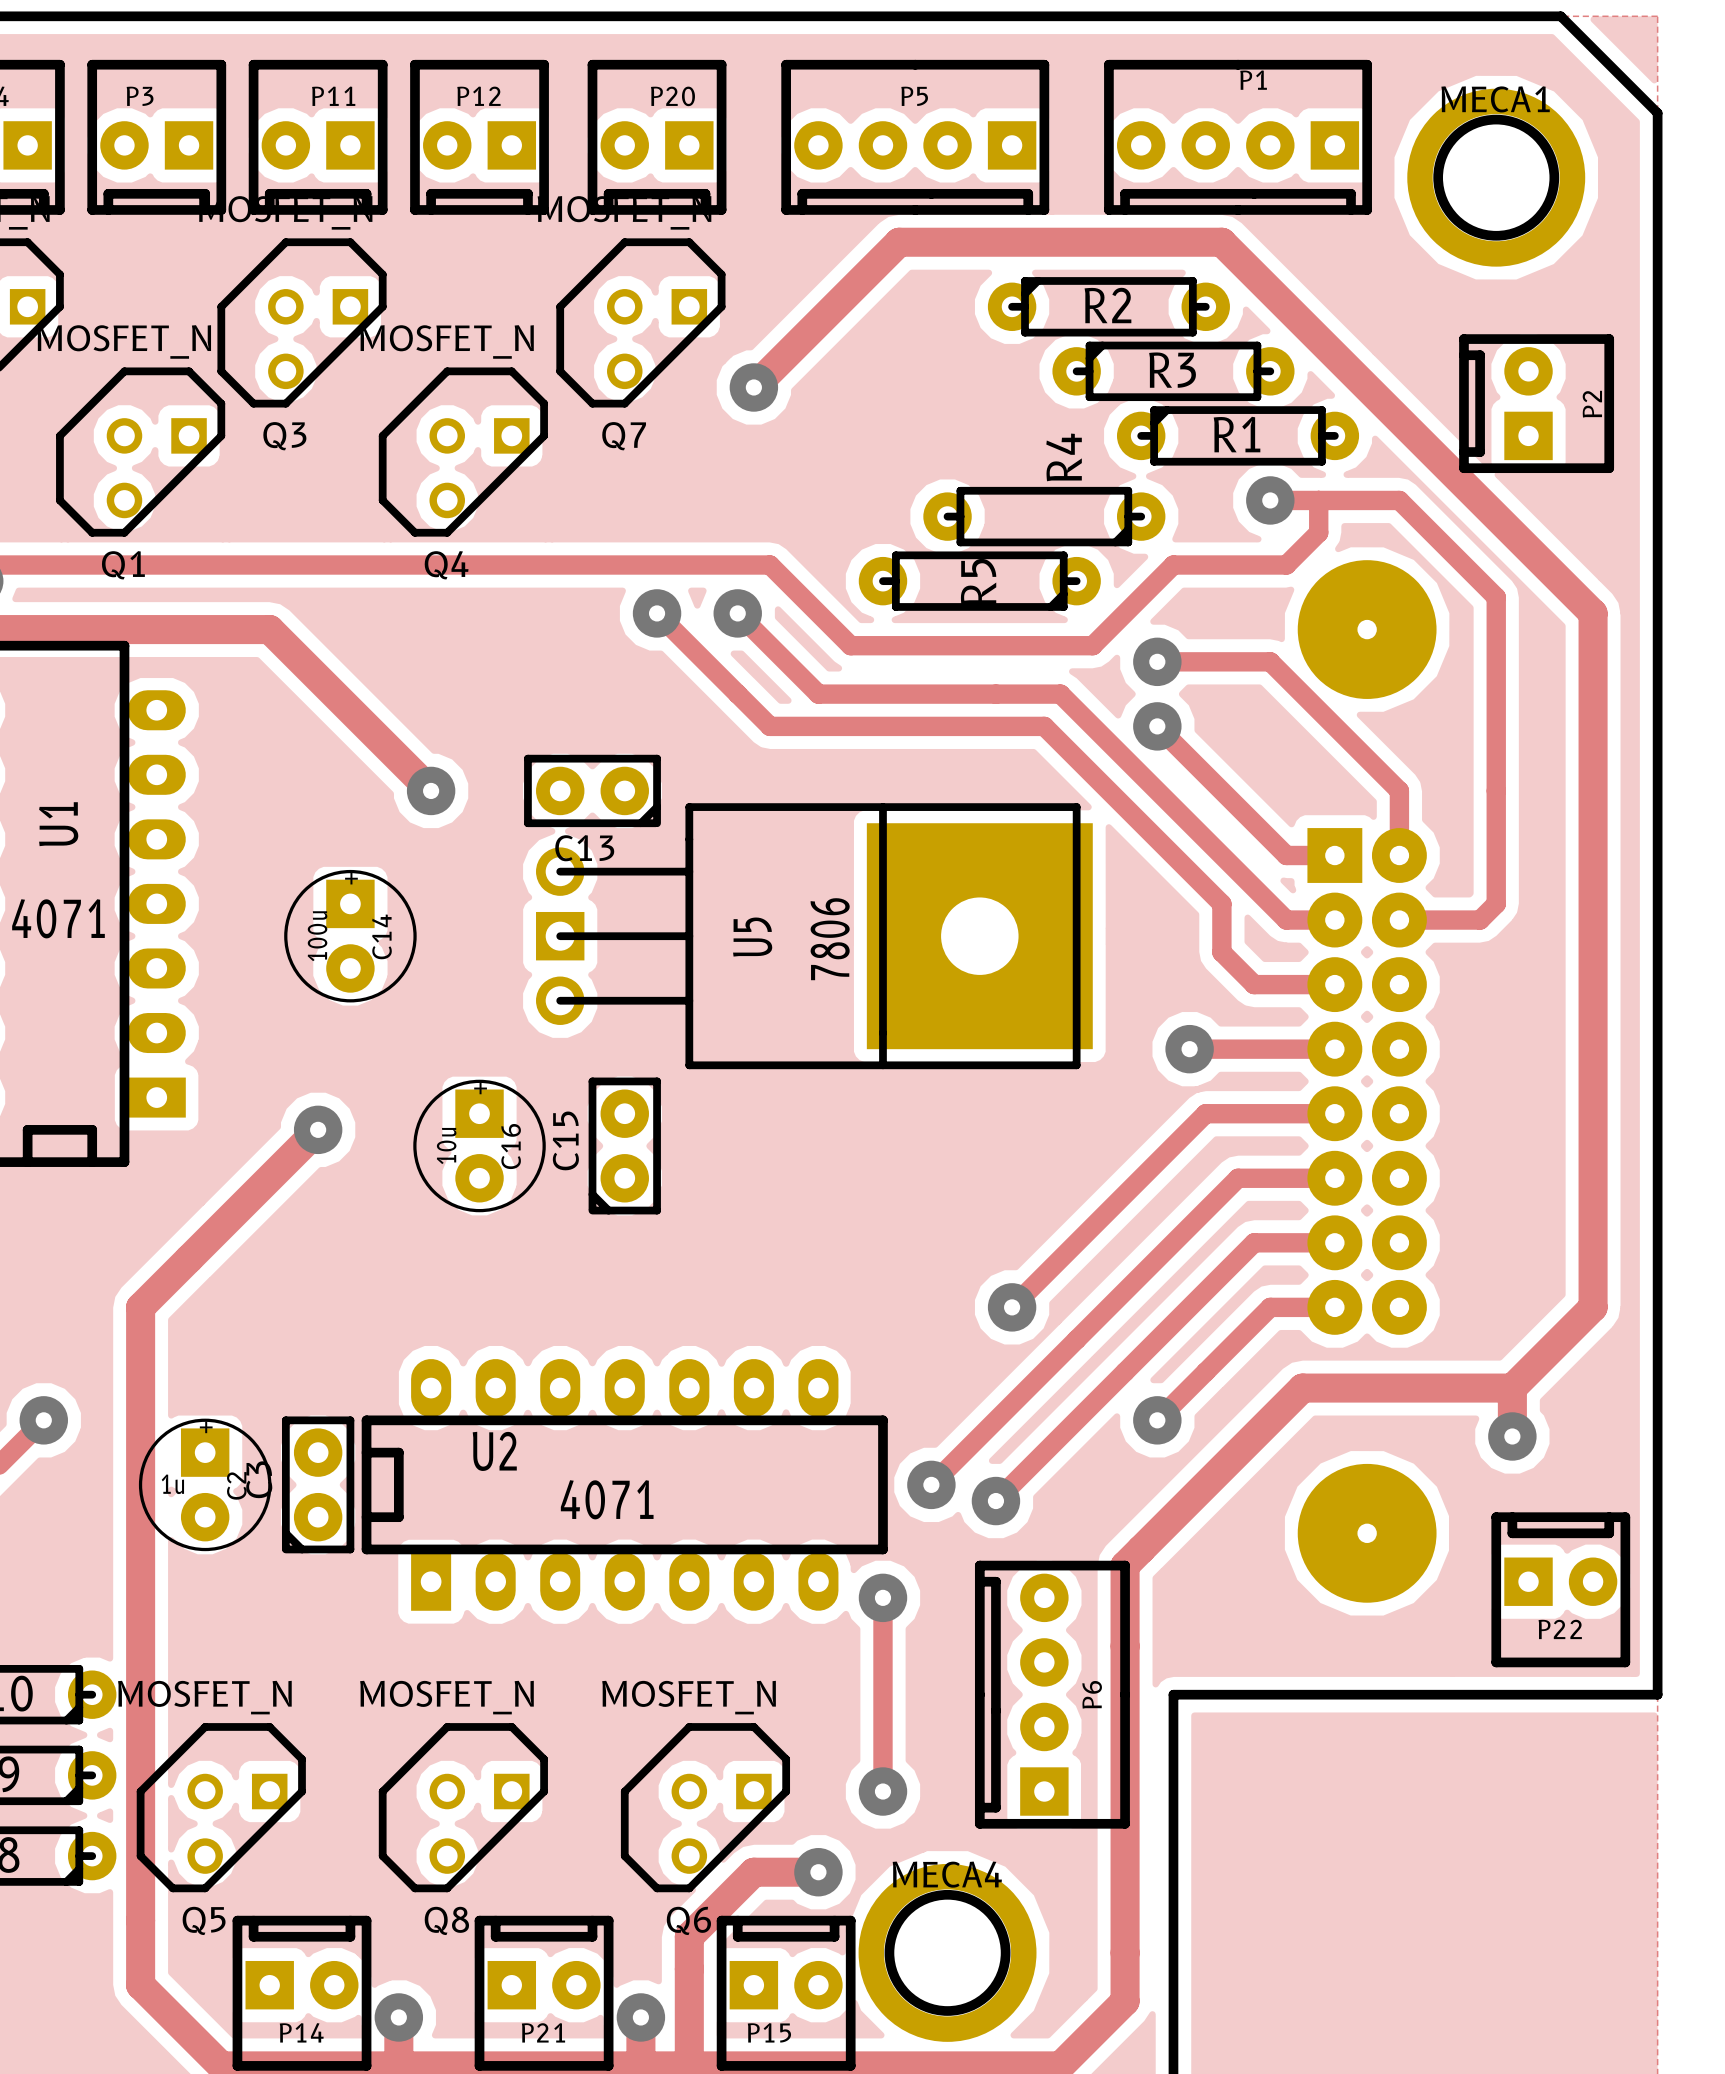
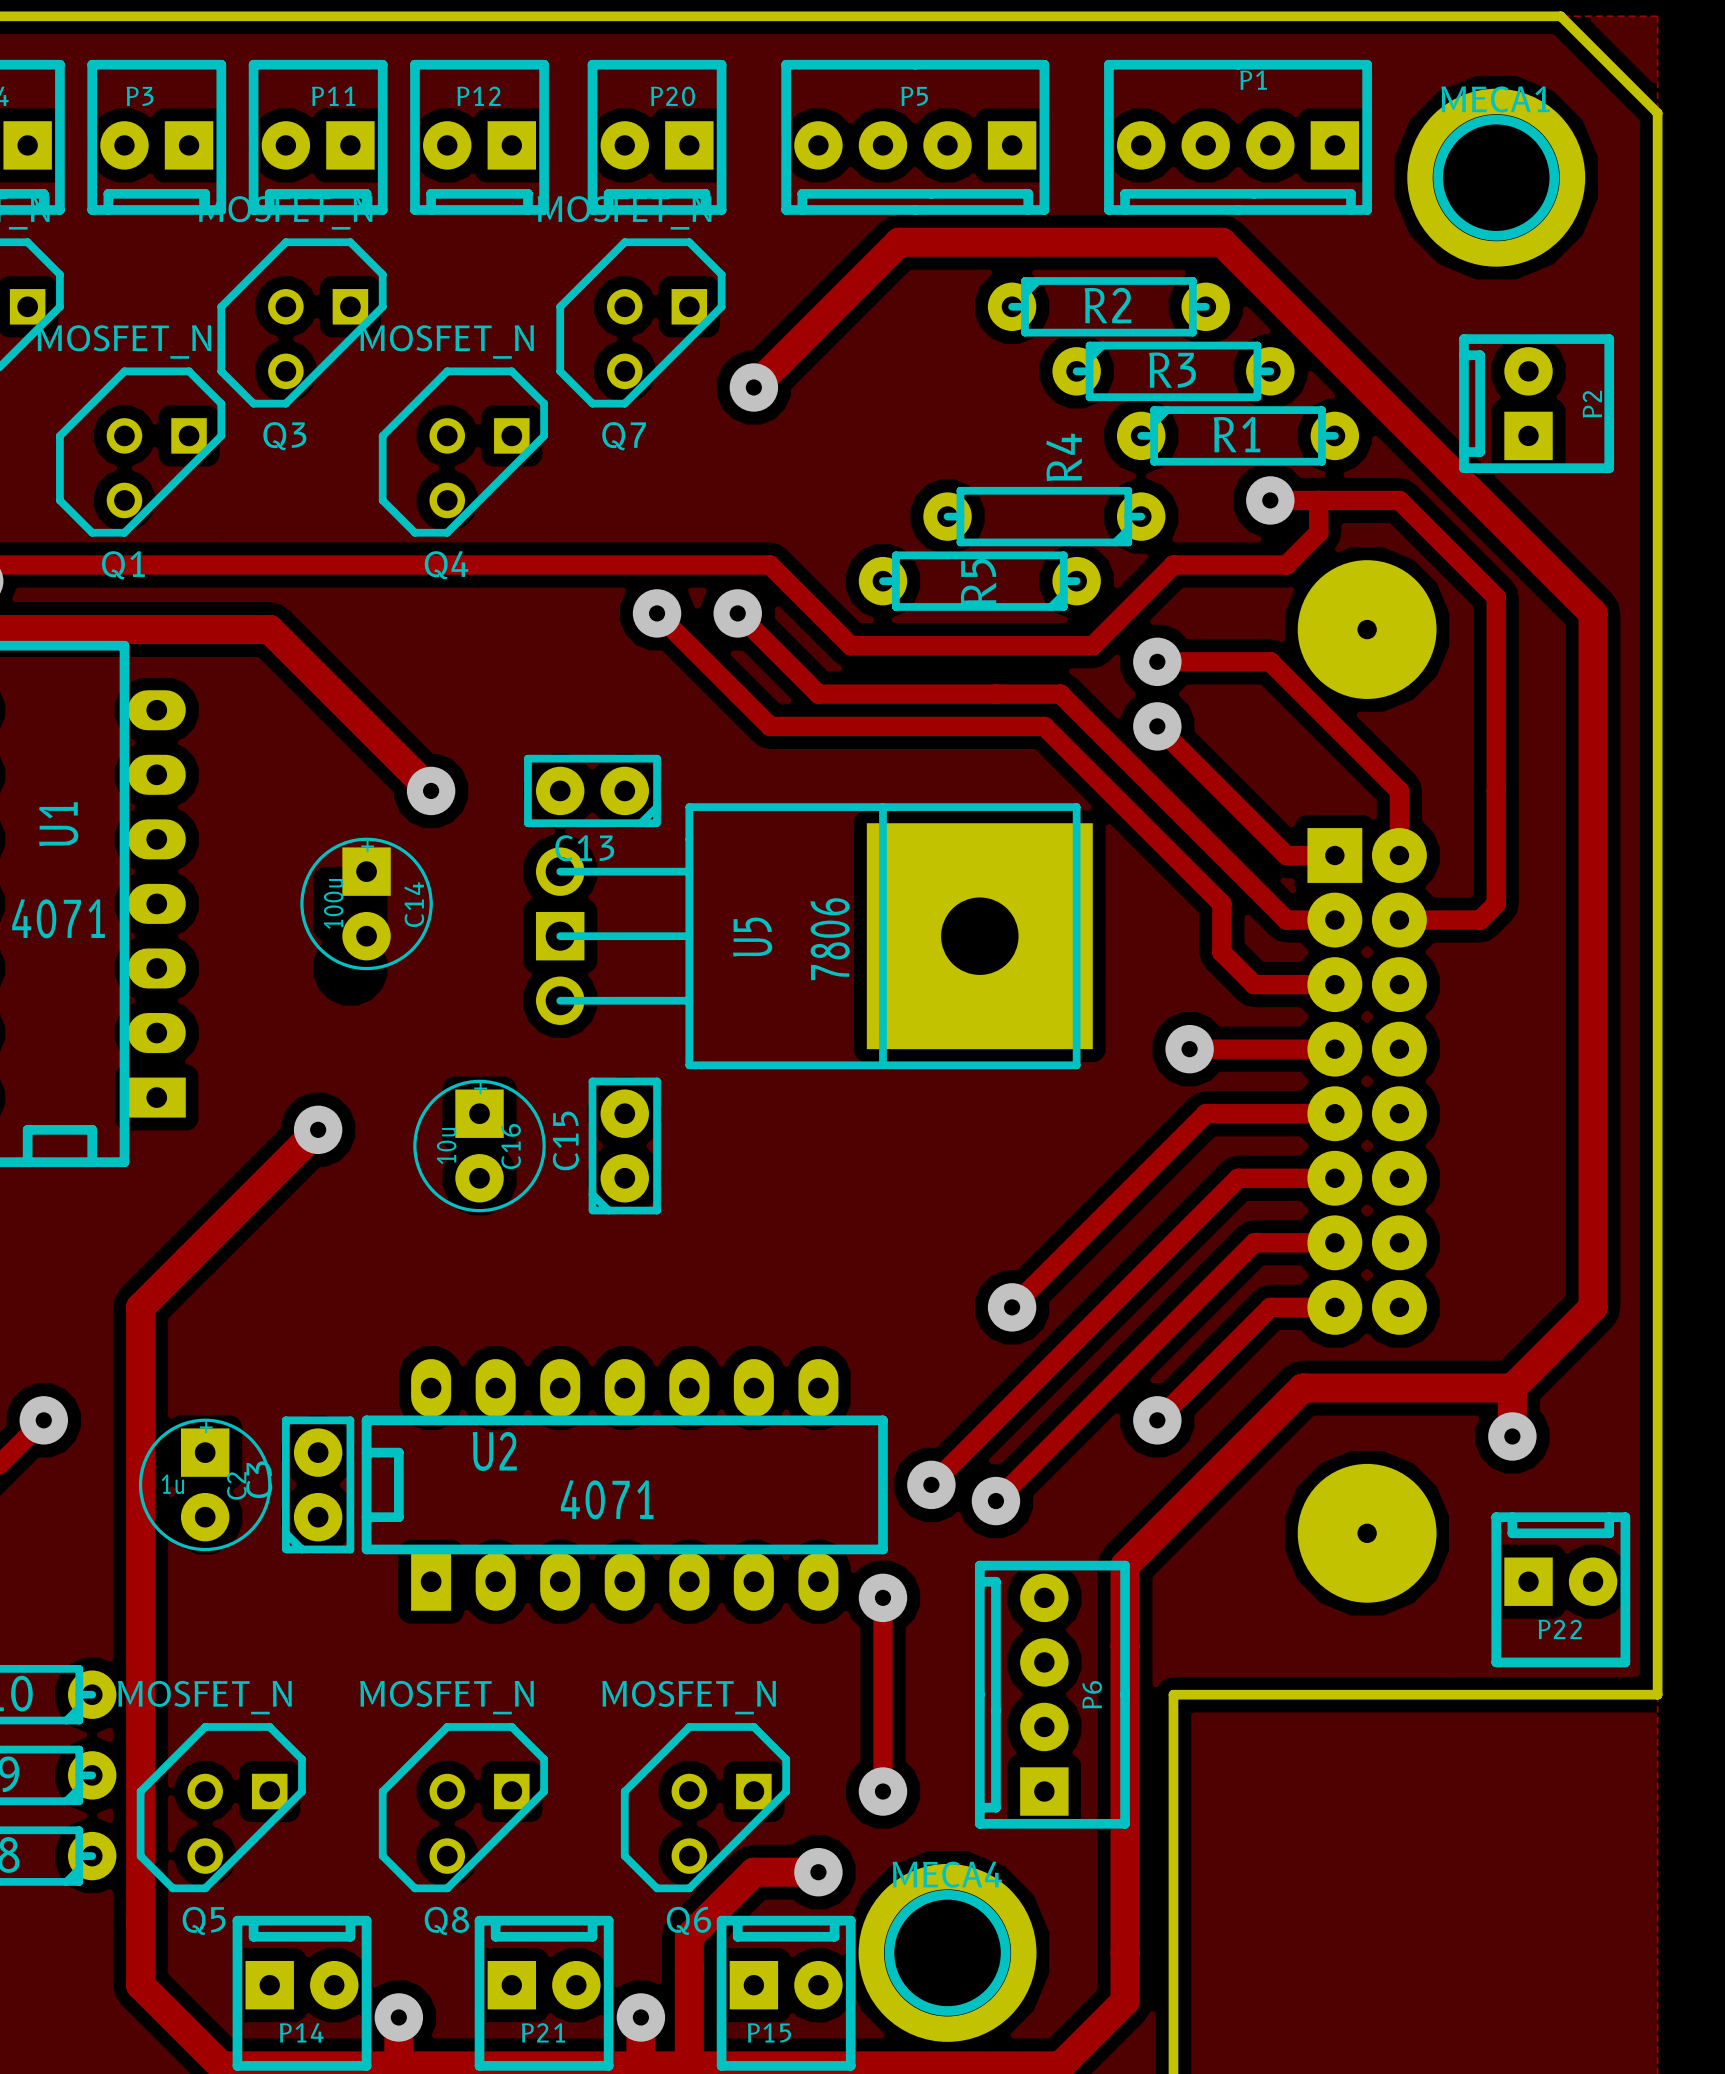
C14 position: (350, 936) -> (366, 903)
C14 name position: C14 (382, 936) -> C14 (414, 904)

